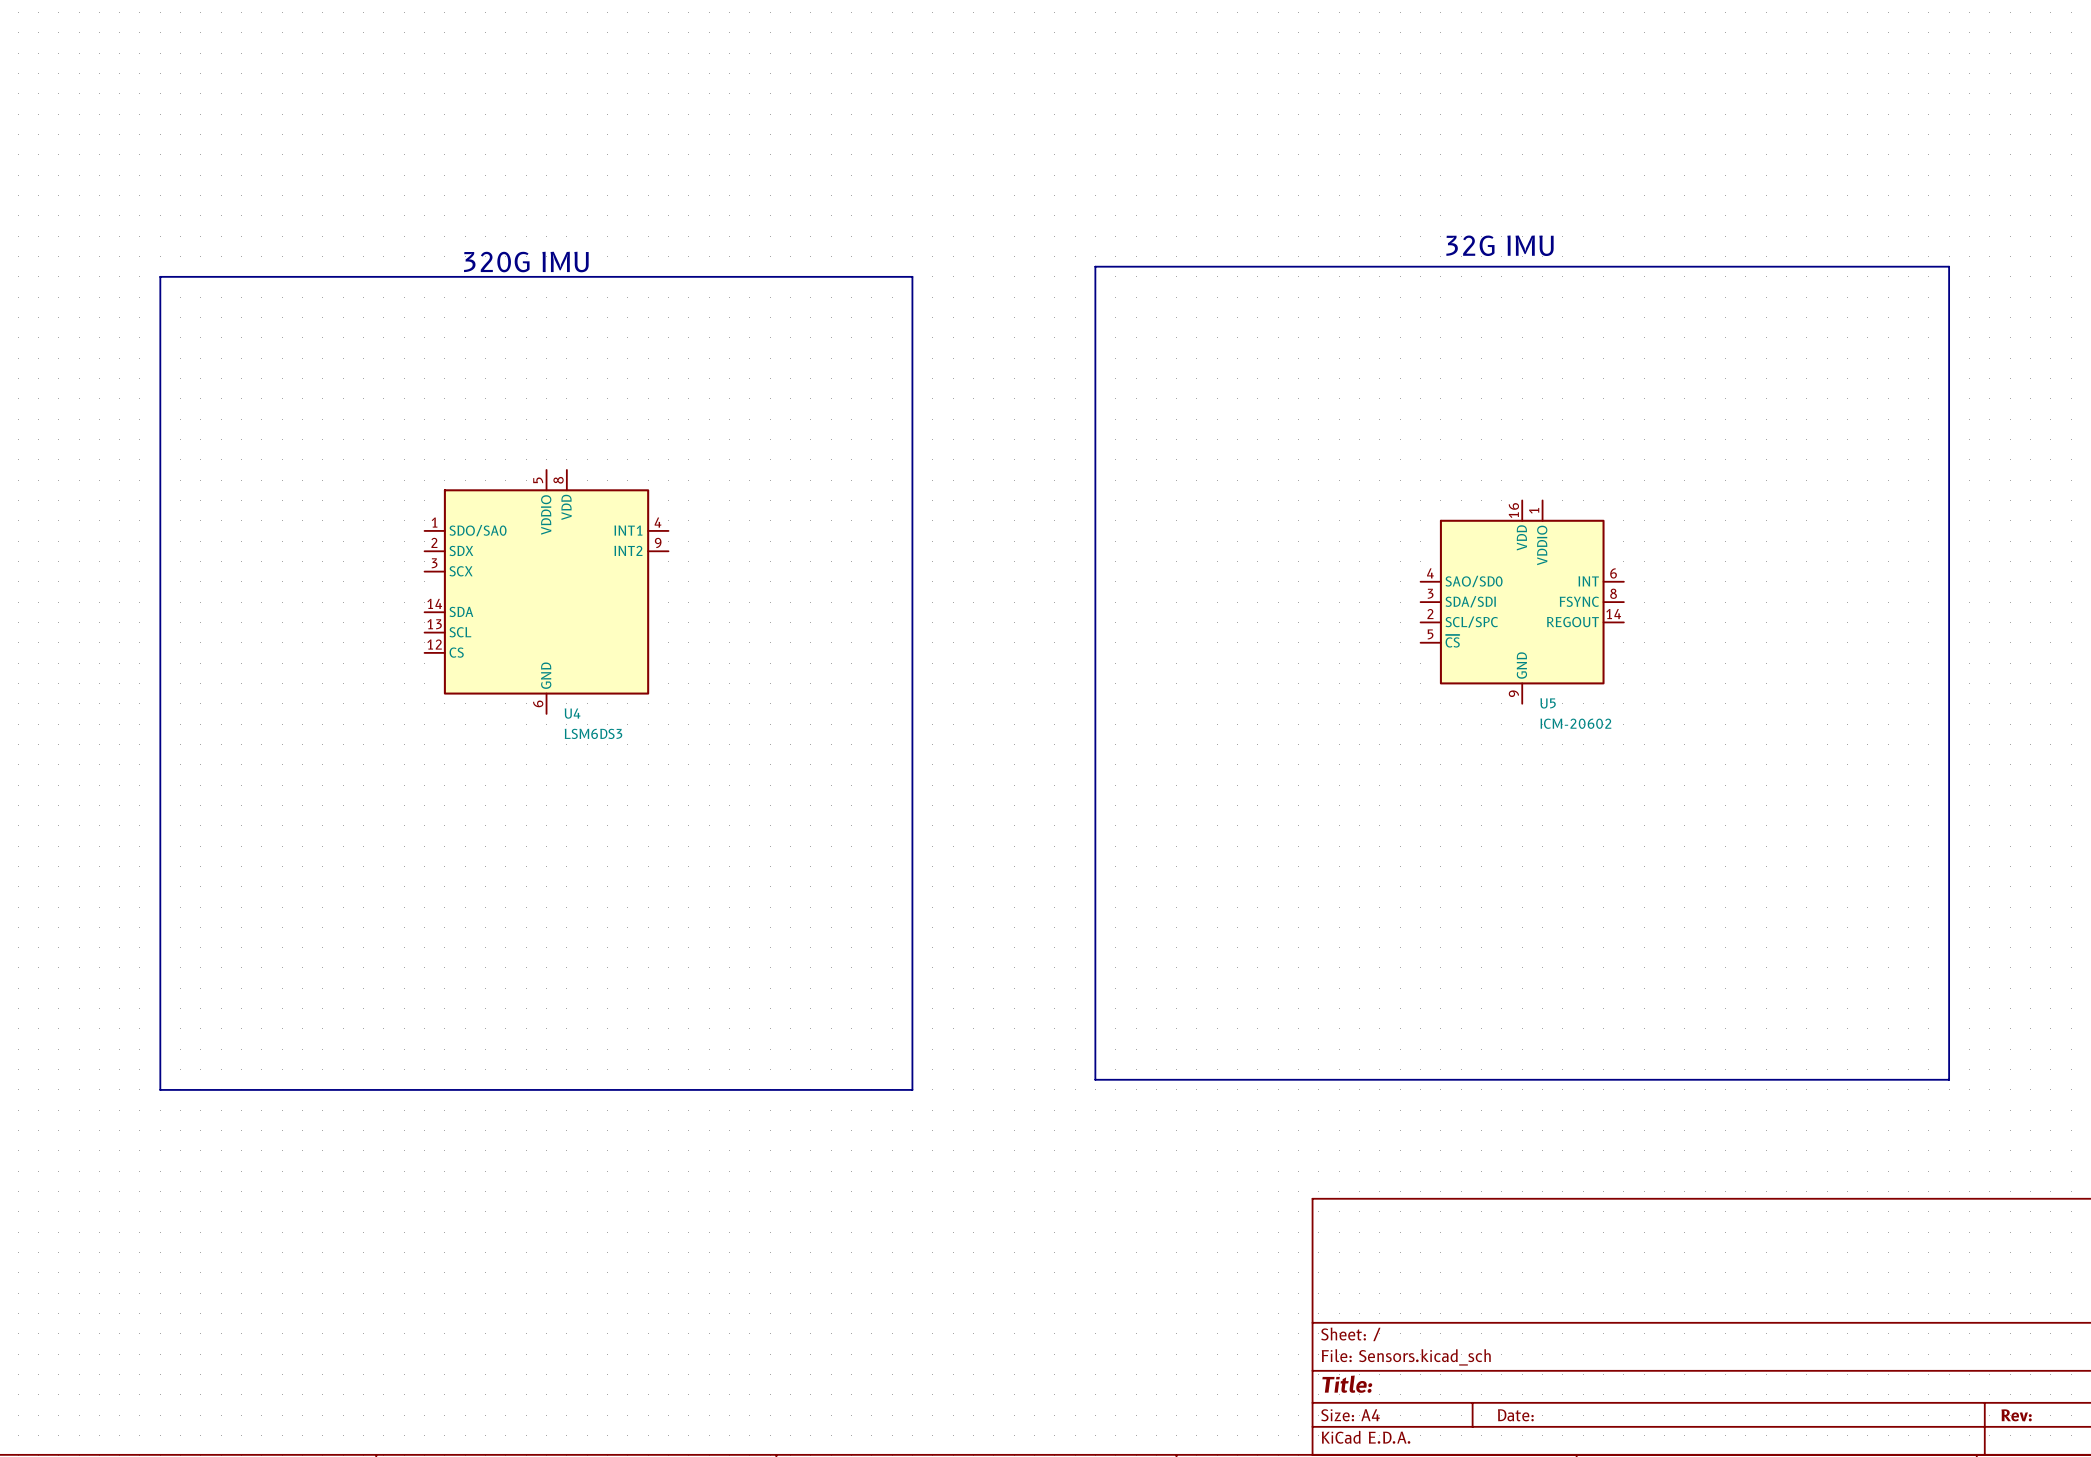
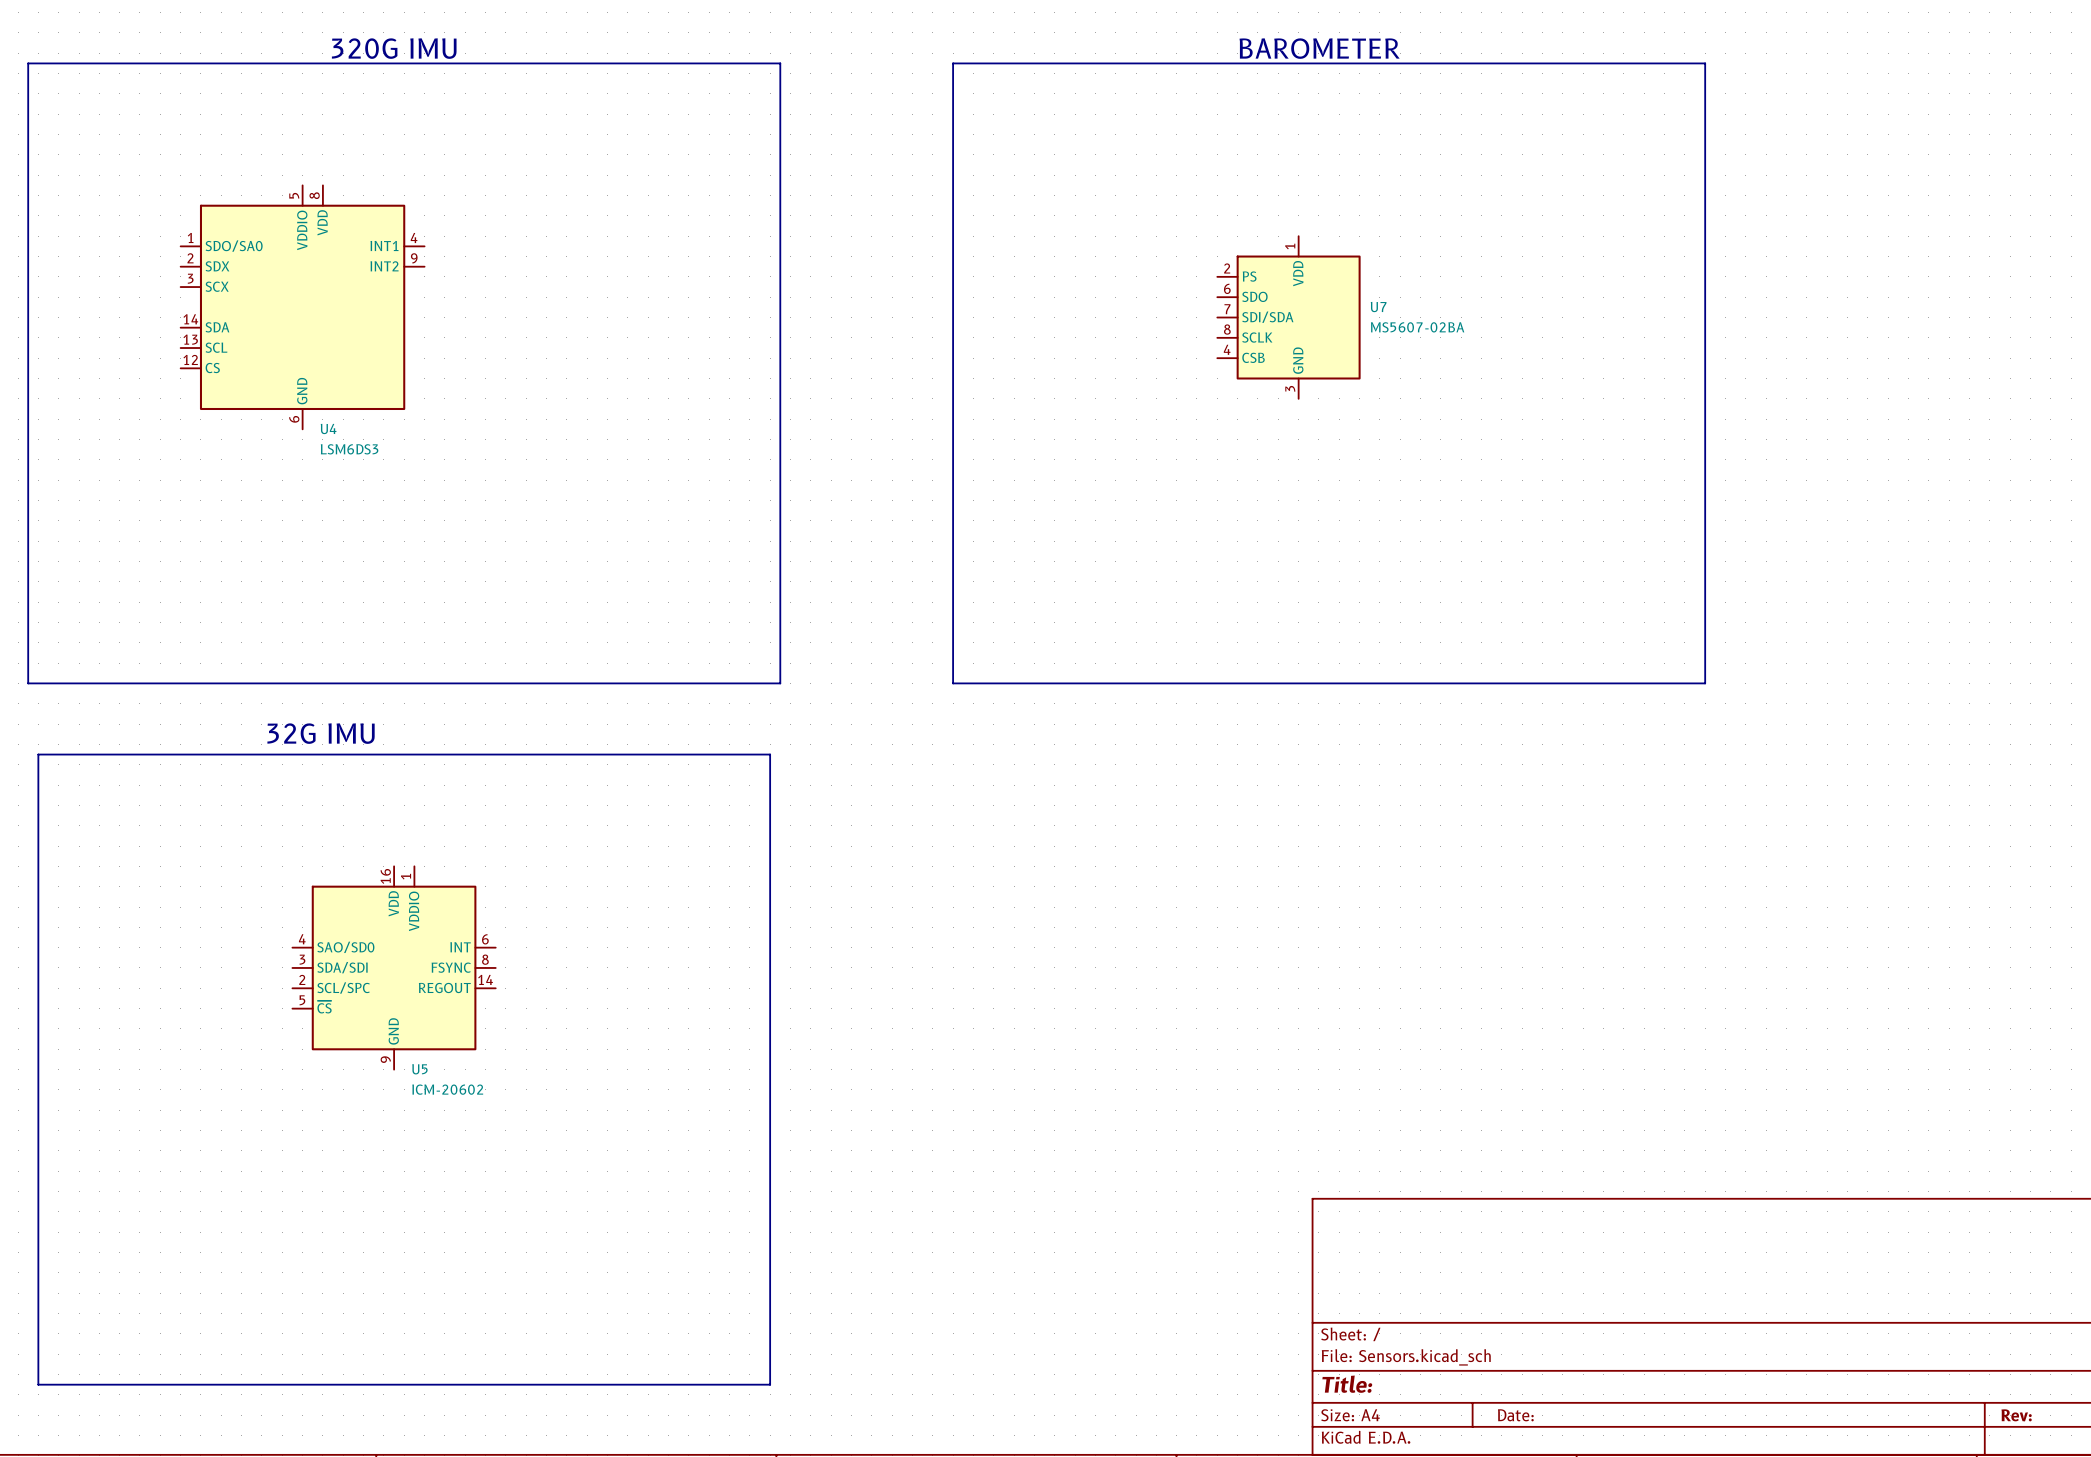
text: none -> 320G IMU (394, 48)
text: none -> BAROMETER (1319, 48)
line: none -> (28, 63) (780, 63) (780, 683) (28, 683) (28, 63)
line: none -> (953, 63) (1705, 63) (1705, 683) (953, 683) (953, 63)
text: 32G IMU (1500, 245) -> none
text: 320G IMU (526, 262) -> none
line: (1095, 266) (1949, 266) (1949, 1079) (1095, 1079) (1095, 266) -> none
line: (160, 276) (912, 276) (912, 1089) (160, 1089) (160, 276) -> none
U7: none -> MS5607-02BA (1288, 317)
U4 position: (546, 591) -> (302, 307)
U5 position: (1522, 602) -> (394, 967)
text: none -> 32G IMU (321, 733)
line: none -> (38, 754) (770, 754) (770, 1384) (38, 1384) (38, 754)

